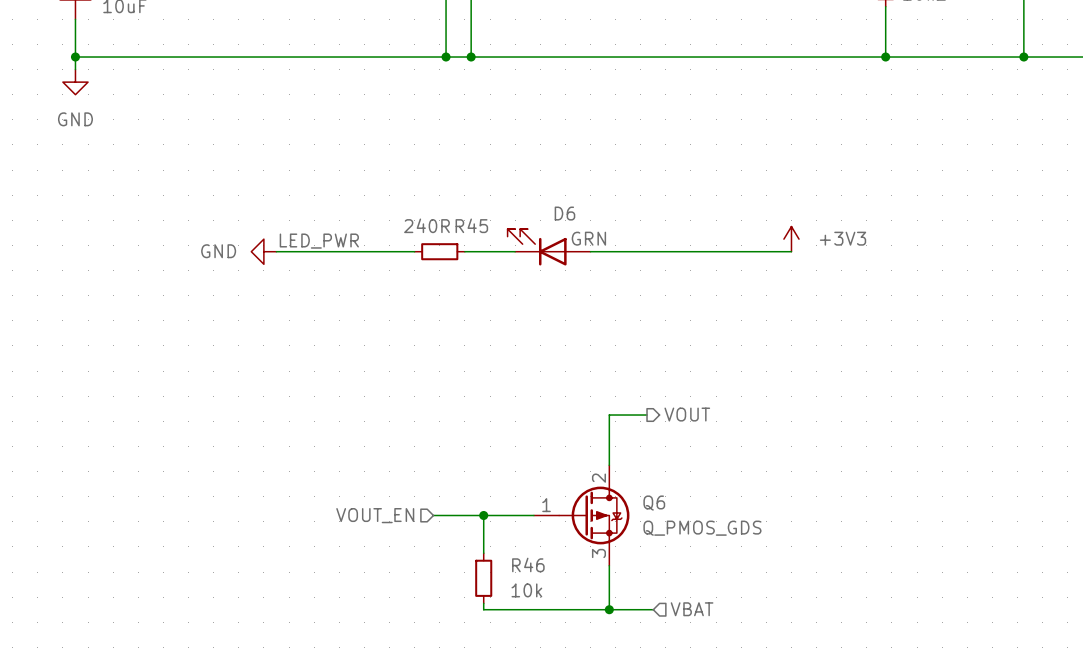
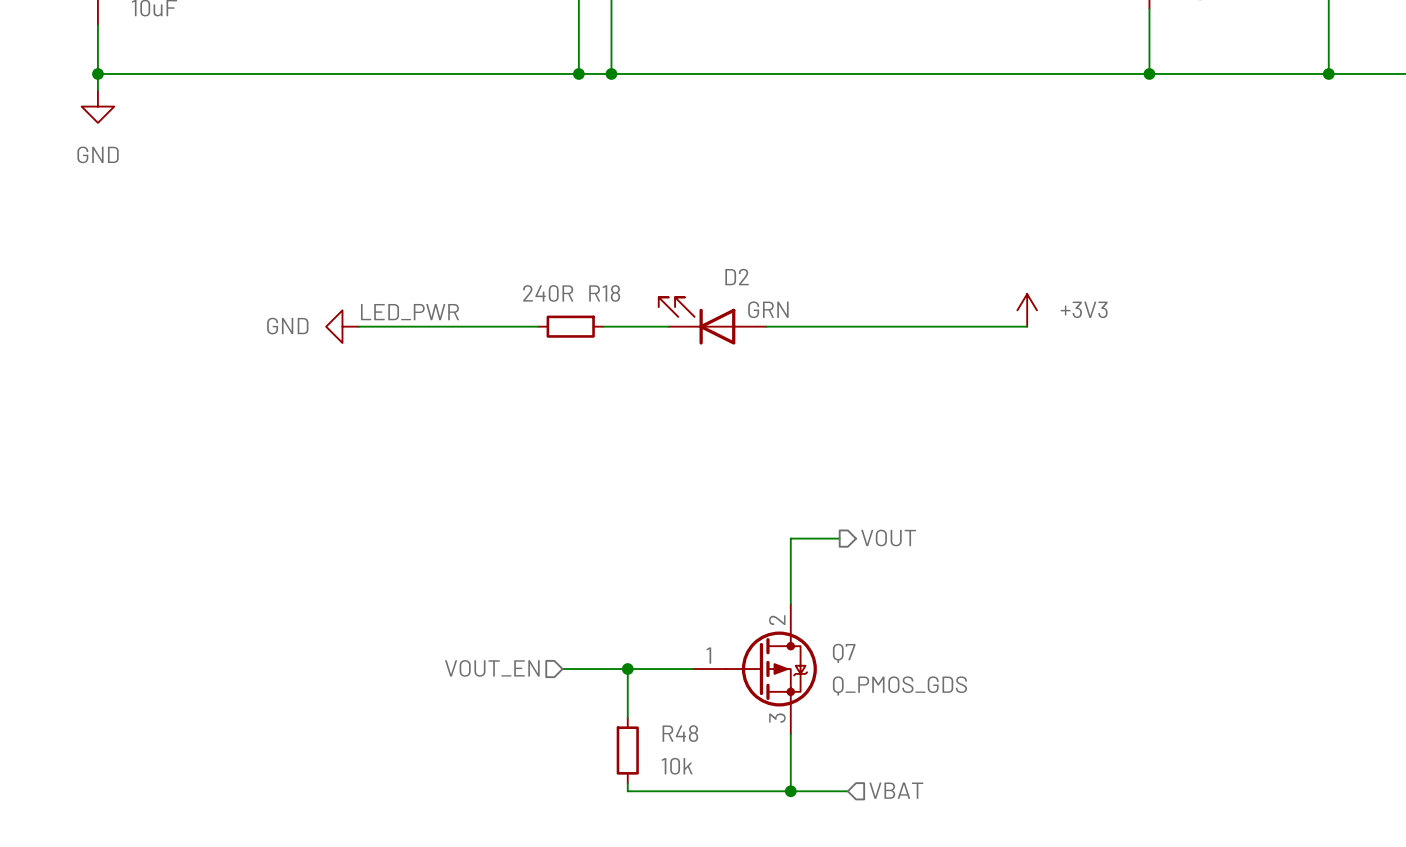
D6 name: D6 (564, 213) -> D2 (737, 277)
R45 name: R45 (471, 225) -> R18 (604, 293)
Q6 name: Q6 (654, 503) -> Q7 (844, 653)
R46 name: R46 (528, 564) -> R48 (680, 733)

